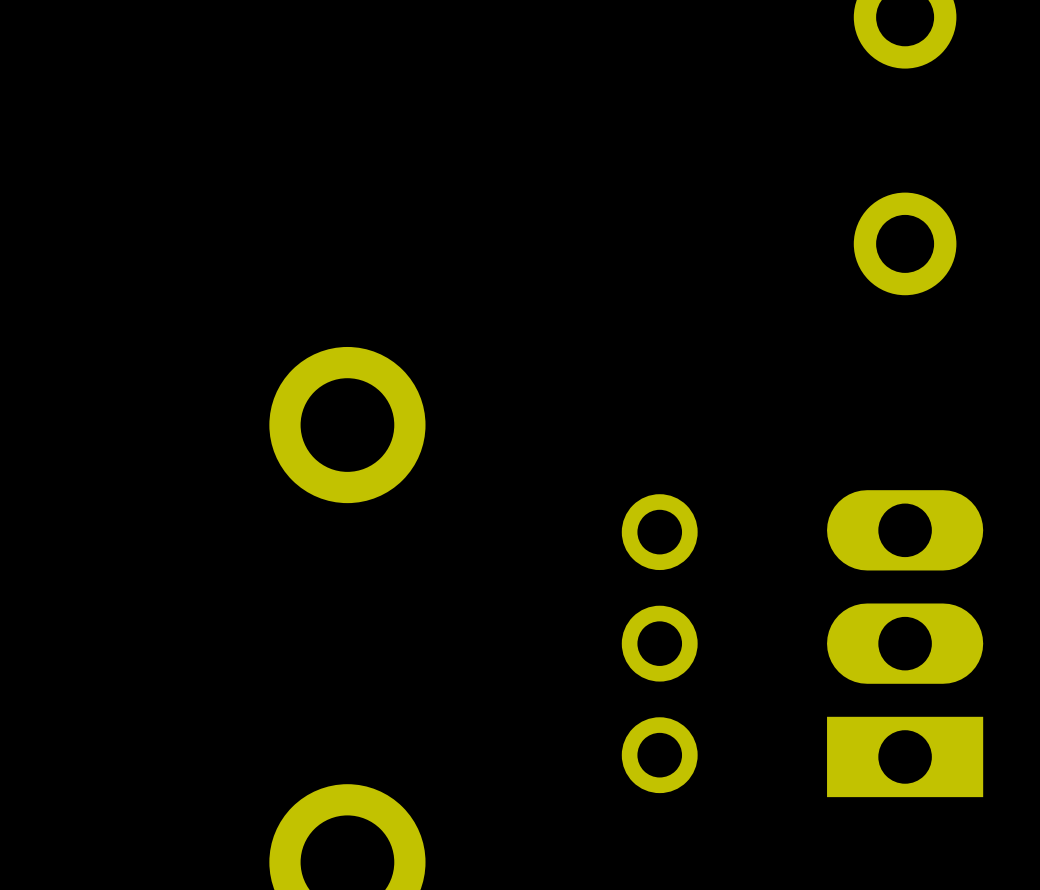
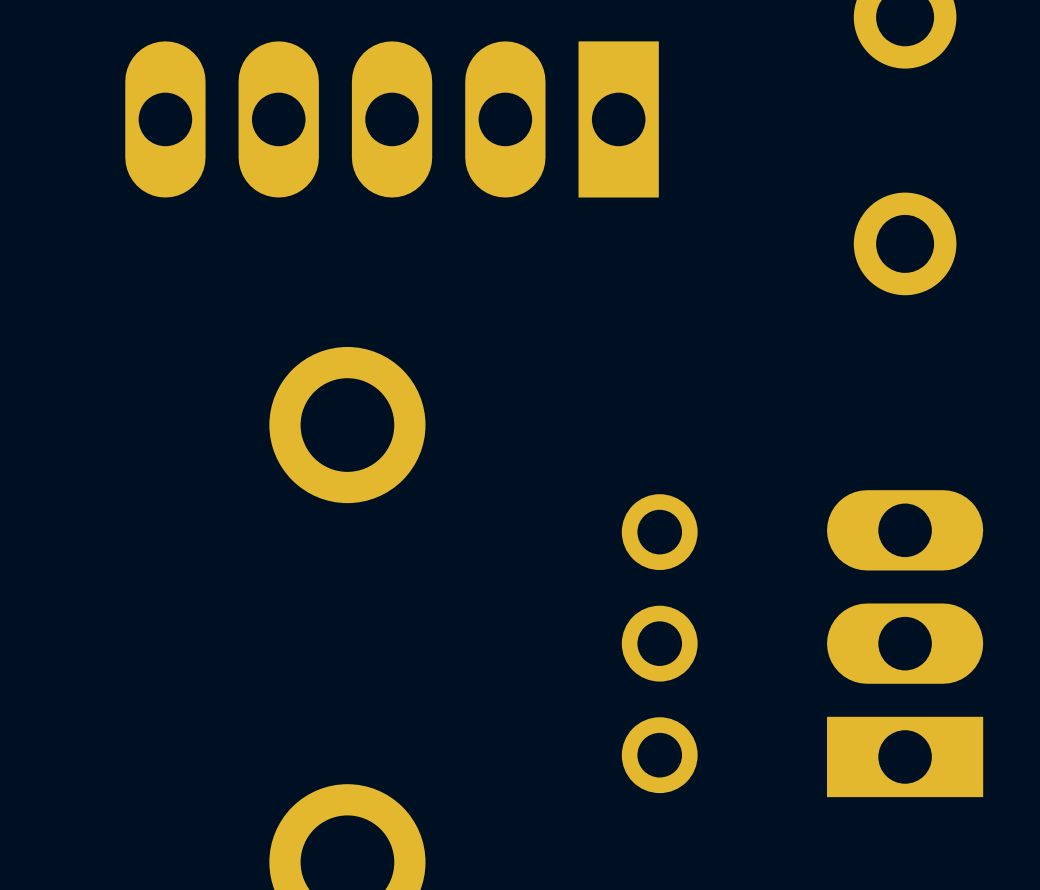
part: none -> (392, 119)

